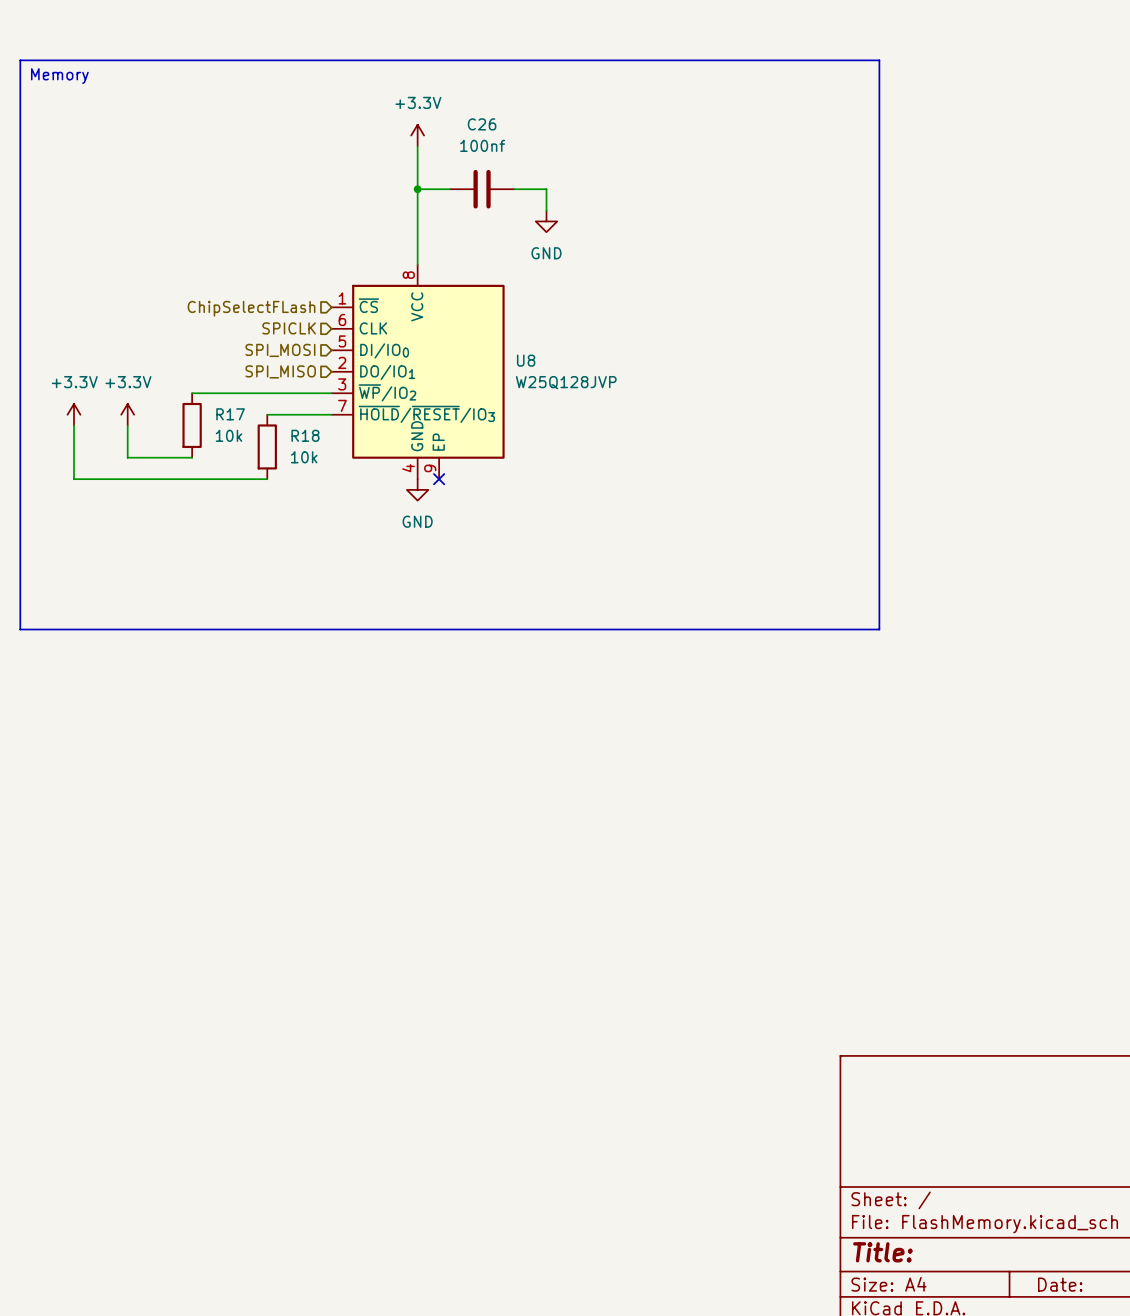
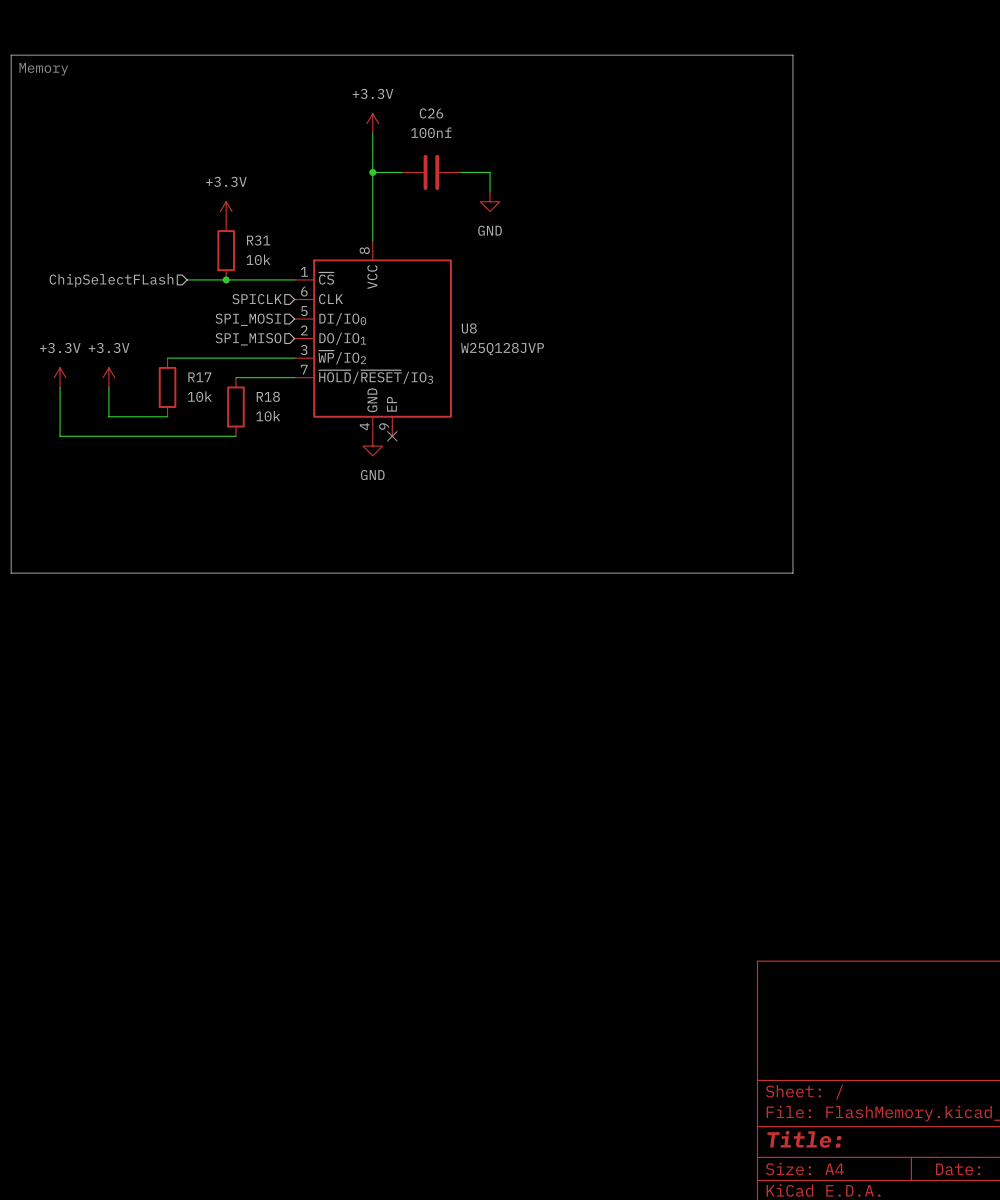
power symbol: none -> +3.3V (226, 211)
R31: none -> 10k (226, 250)
wire: none -> (187, 279) (294, 279)
junction: none -> (226, 279)
hierarchical label position: ChipSelectFLash (251, 308) -> ChipSelectFLash (111, 280)

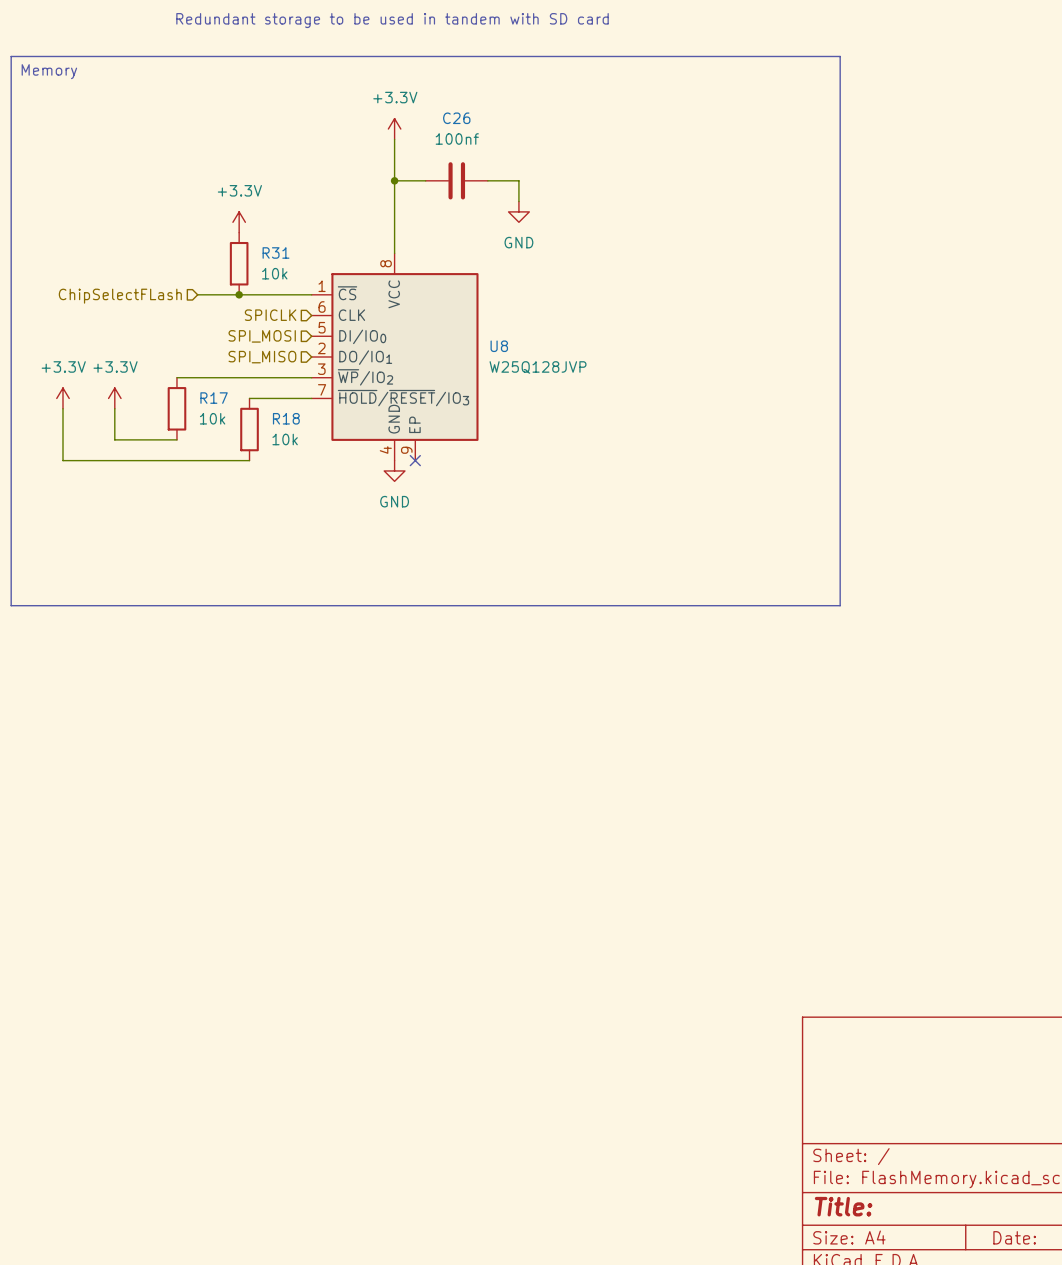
text: none -> Redundant storage to be used in tandem with SD card (392, 20)

